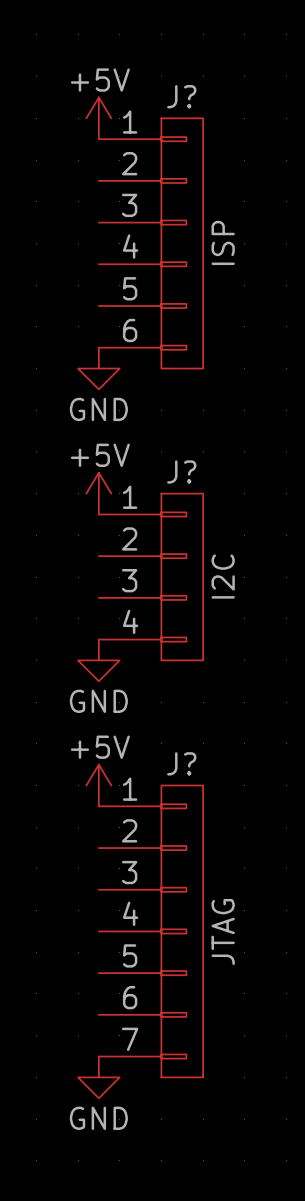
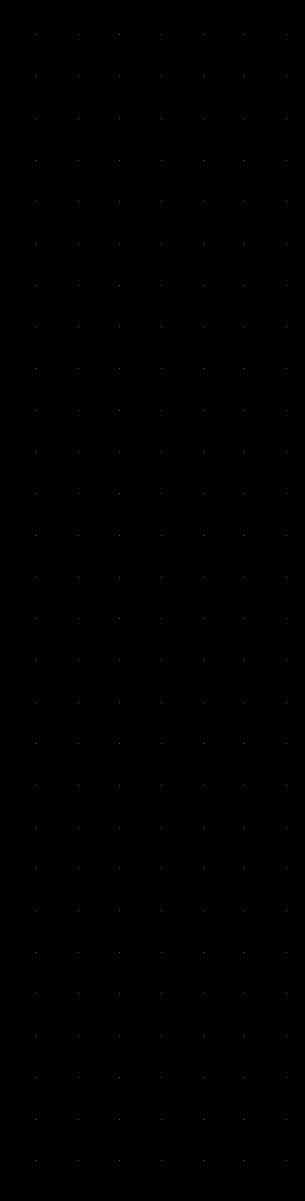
power symbol: +5V (98, 118) -> none
J?: ISP (150, 243) -> none
power symbol: GND (98, 368) -> none
power symbol: +5V (98, 493) -> none
J?: I2C (150, 577) -> none
power symbol: GND (98, 660) -> none
power symbol: +5V (98, 785) -> none
J?: JTAG (150, 931) -> none
power symbol: GND (98, 1077) -> none

